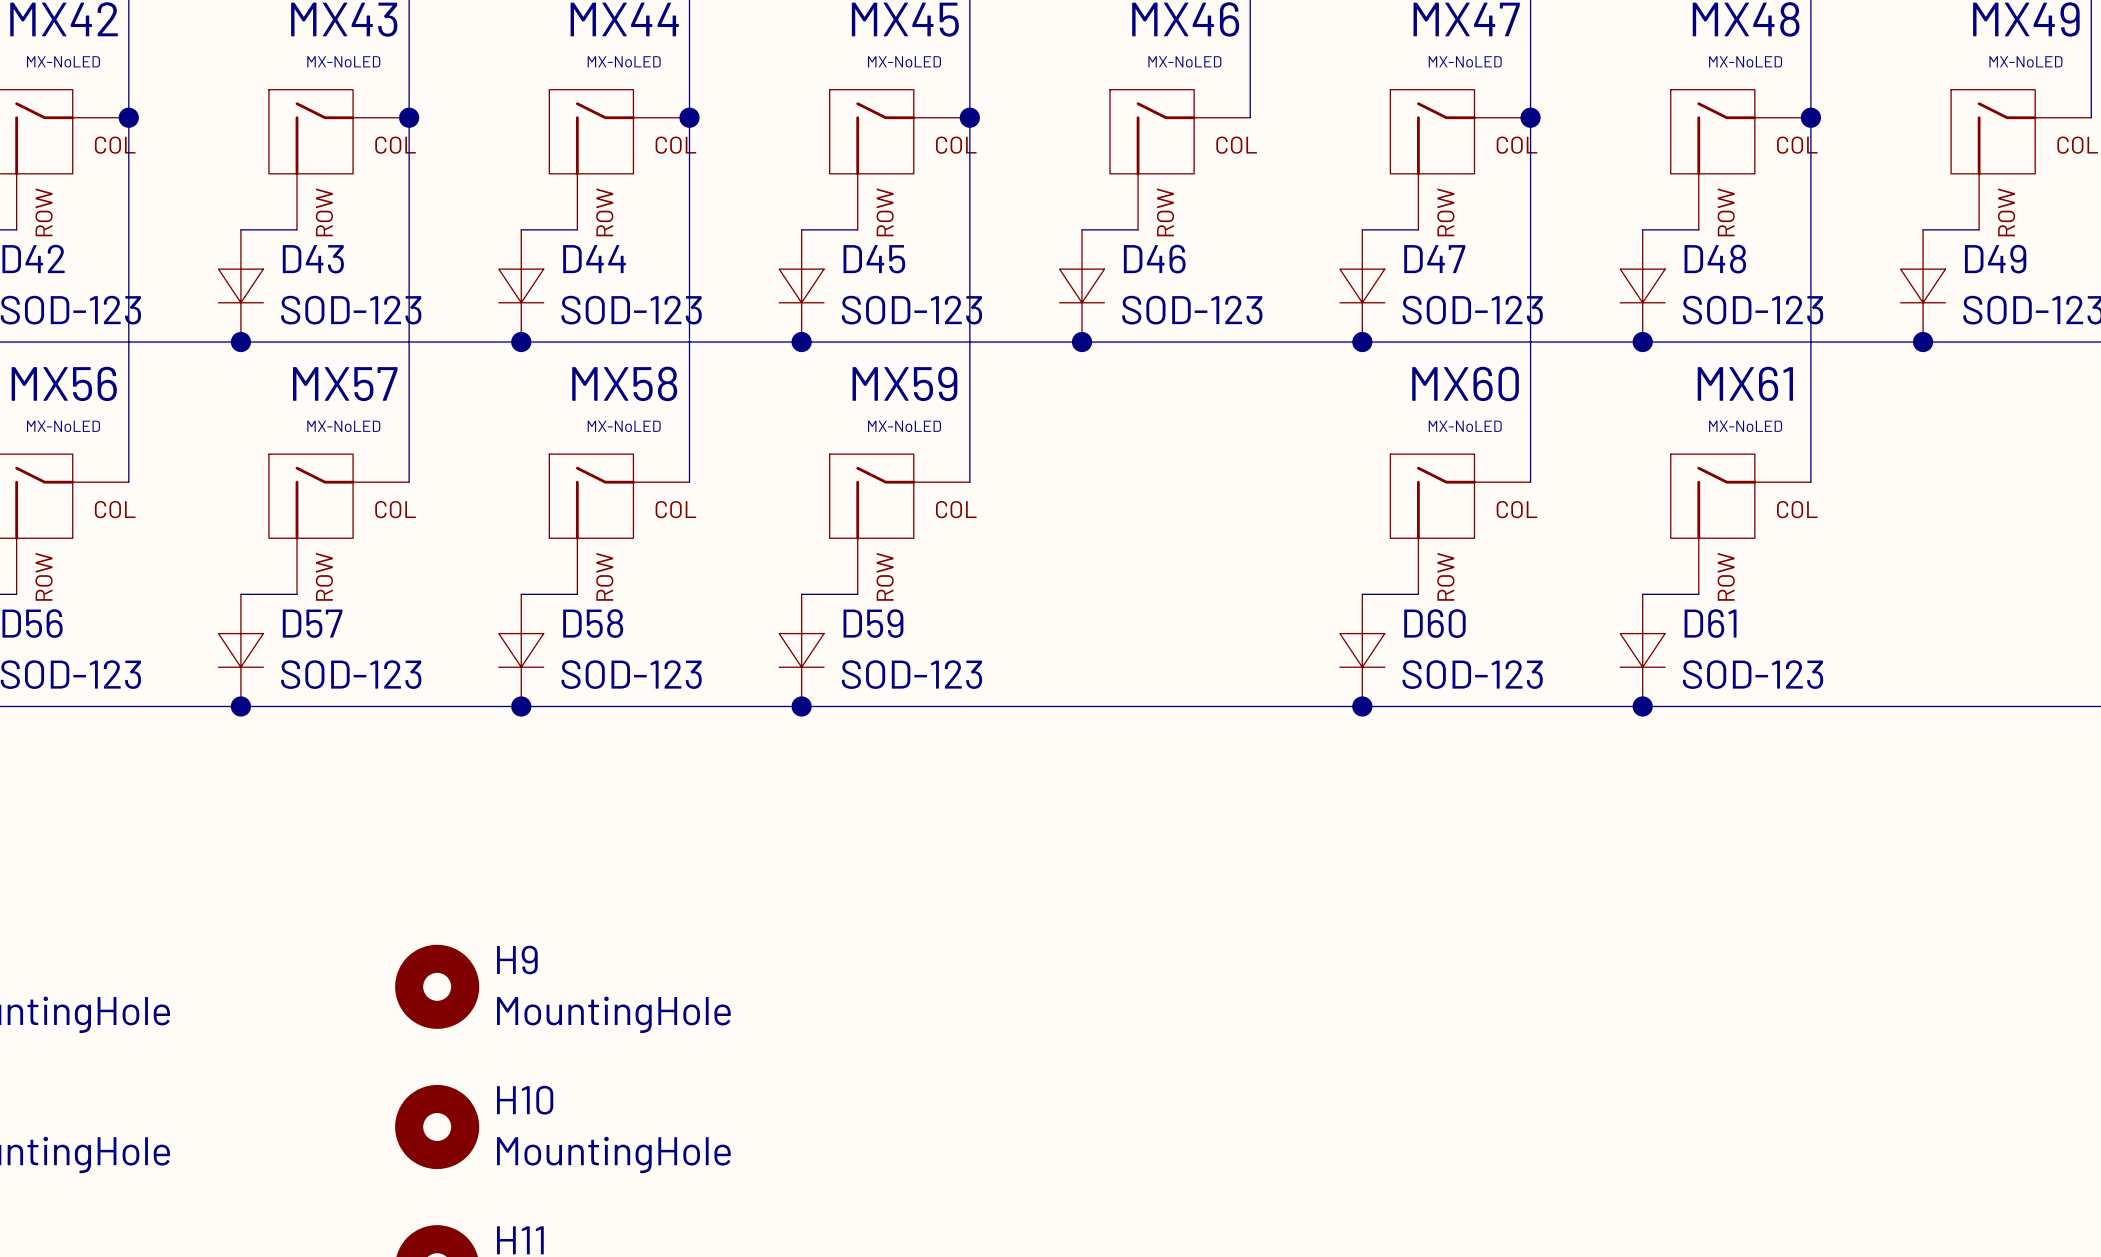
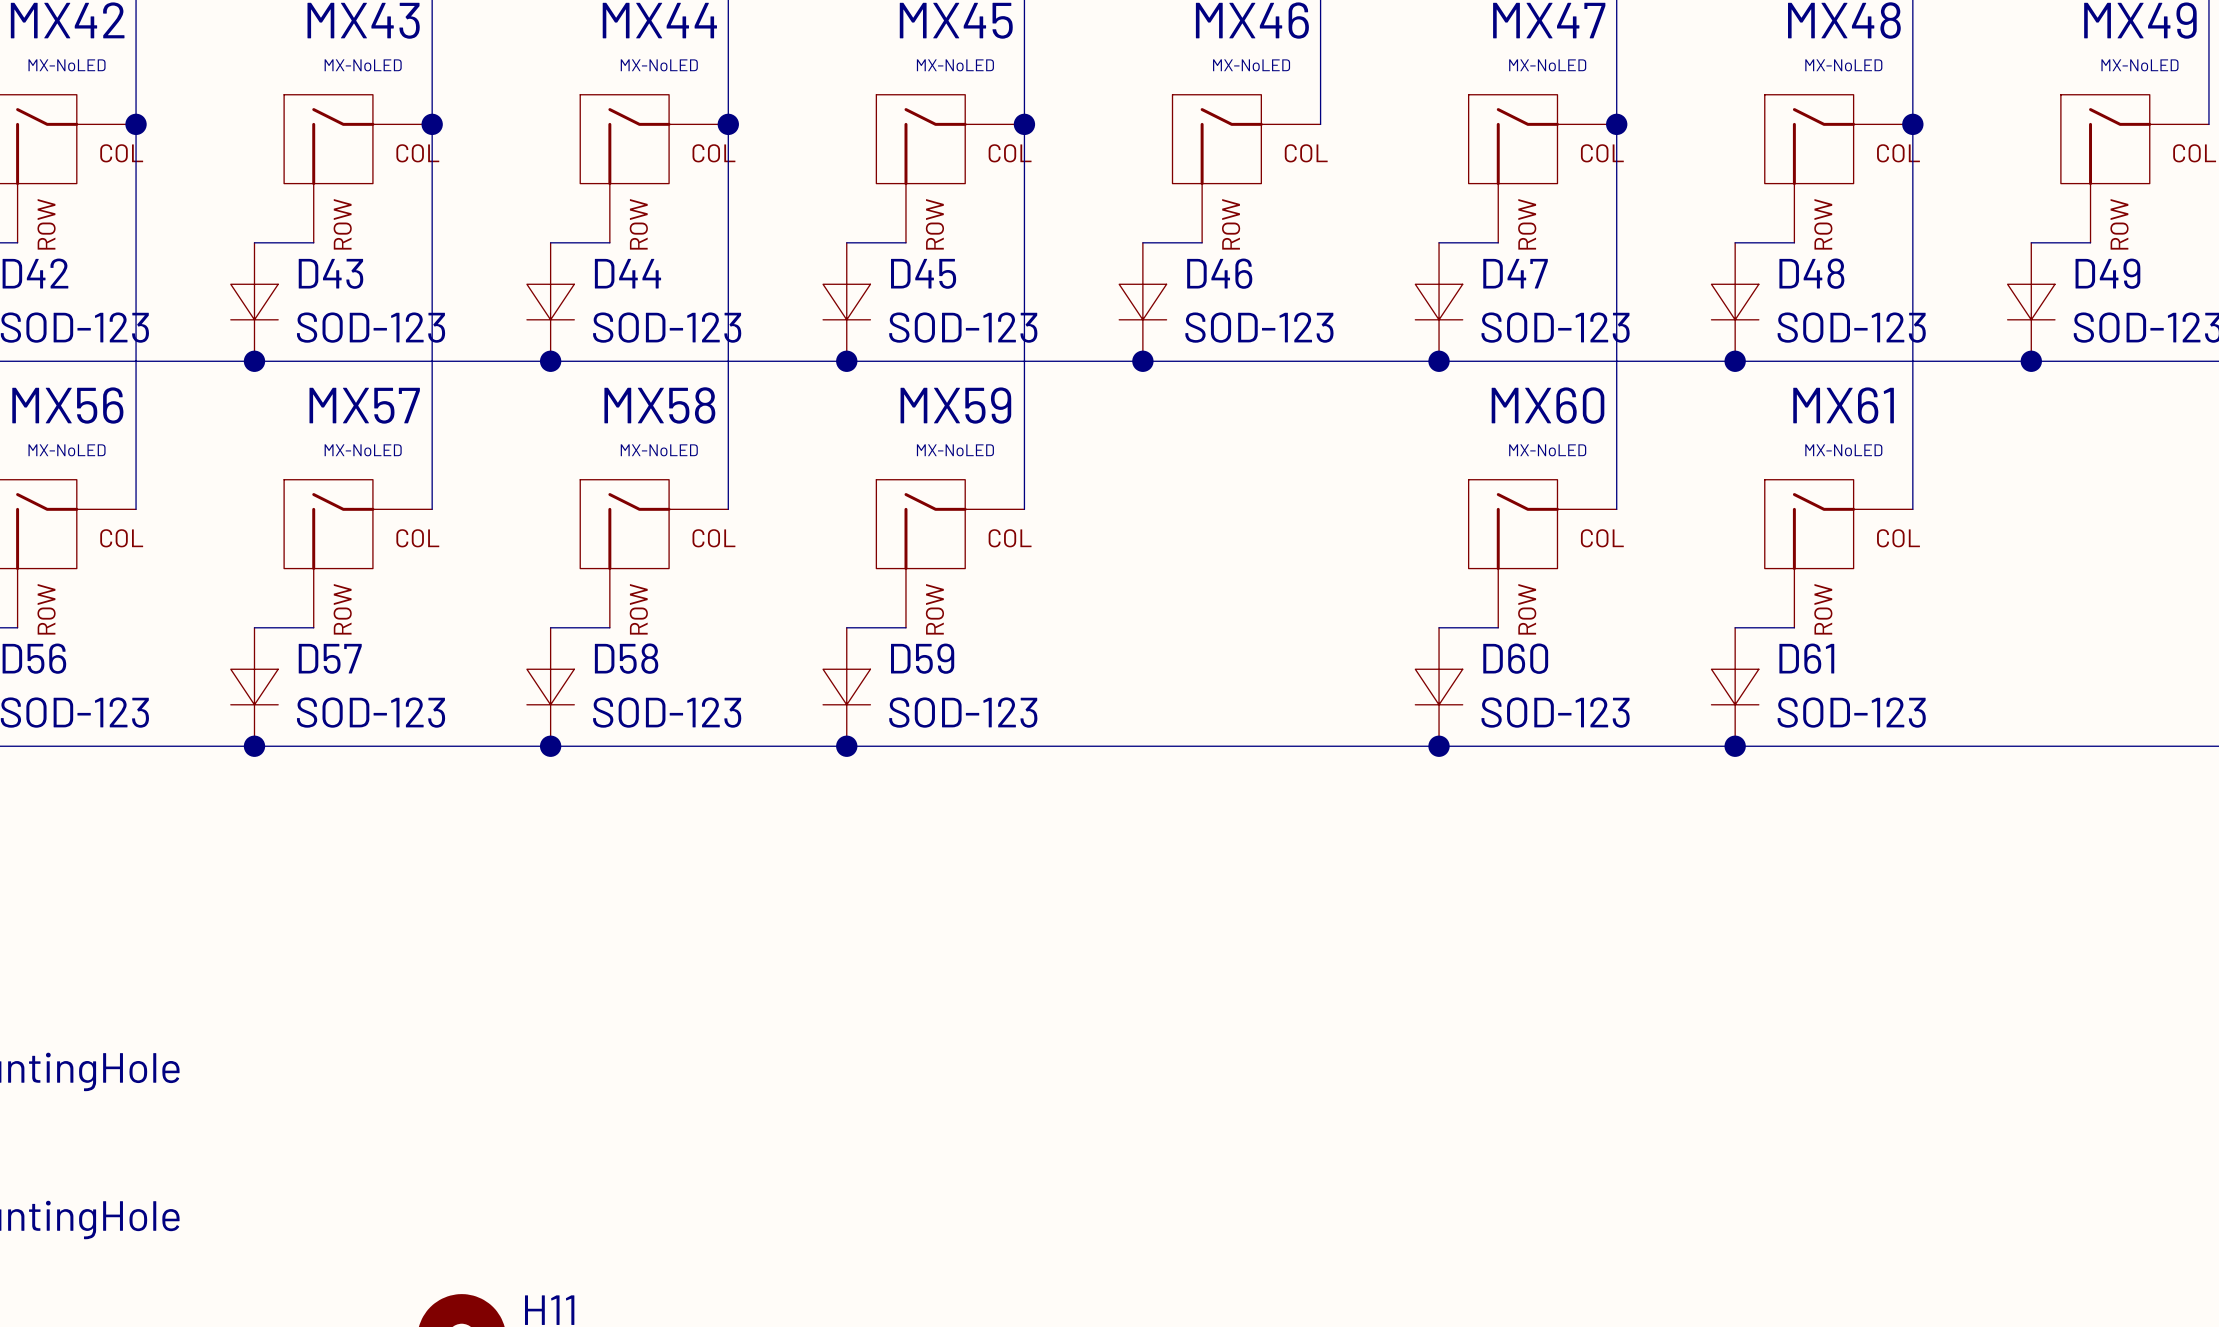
H9: MountingHole (437, 986) -> none
H10: MountingHole (437, 1127) -> none

